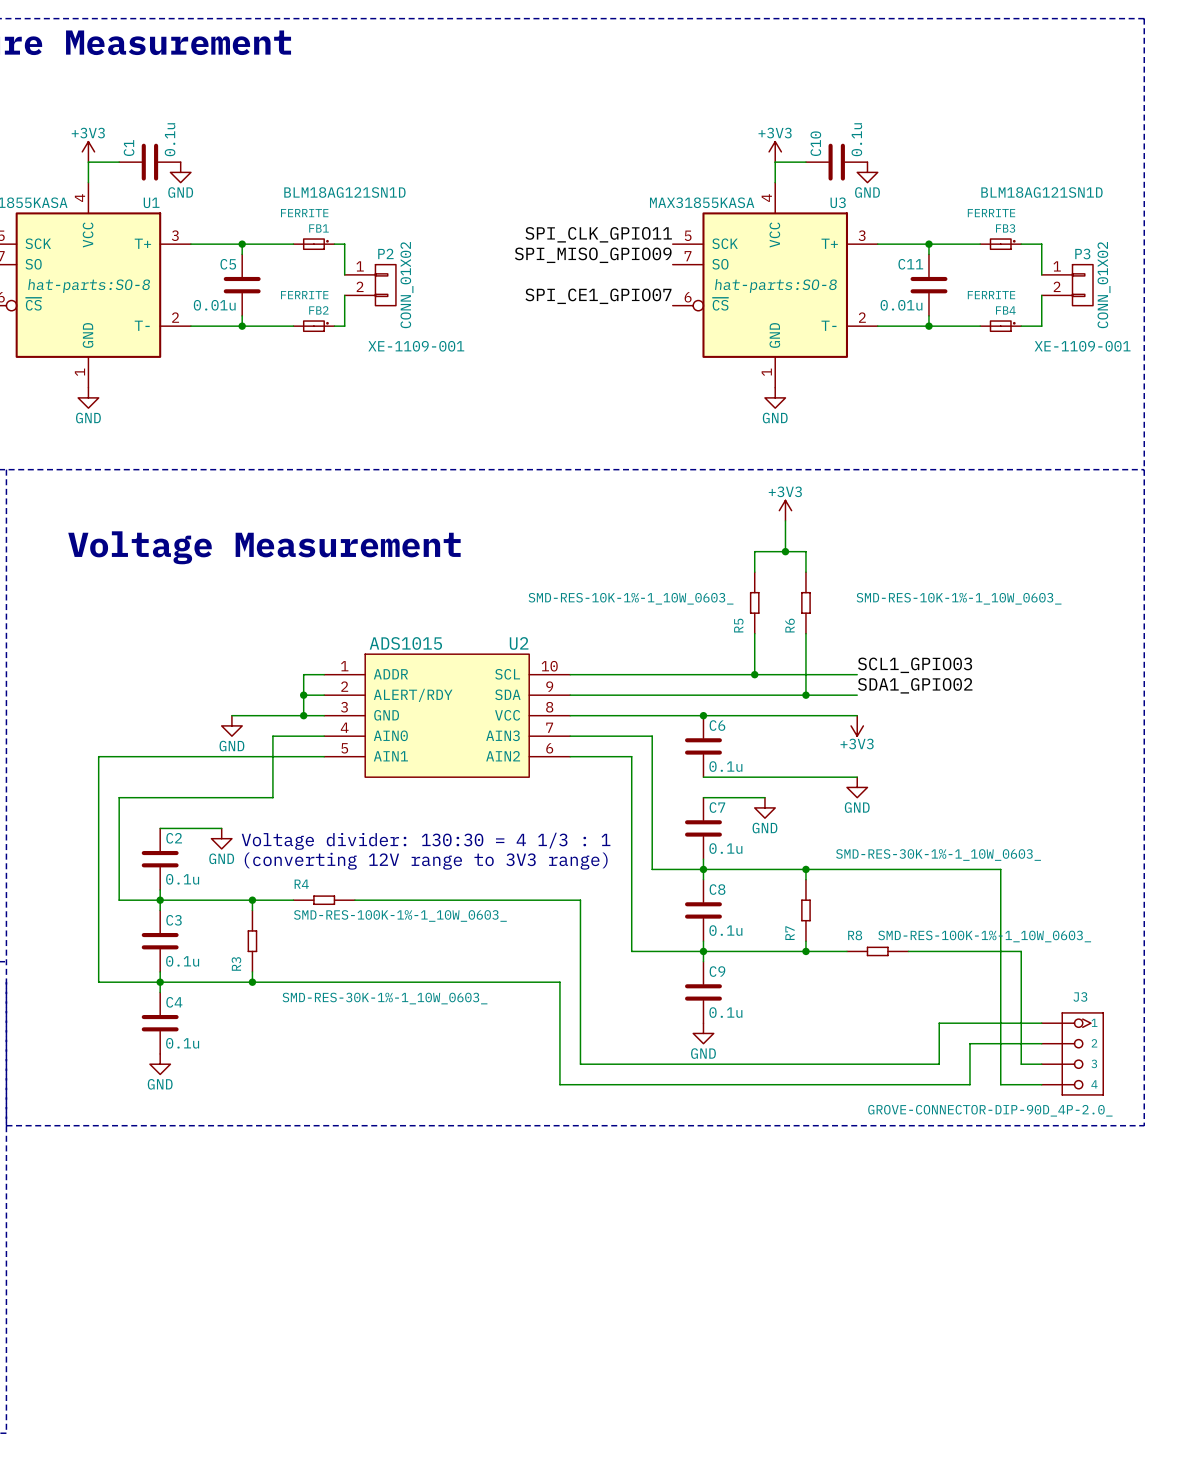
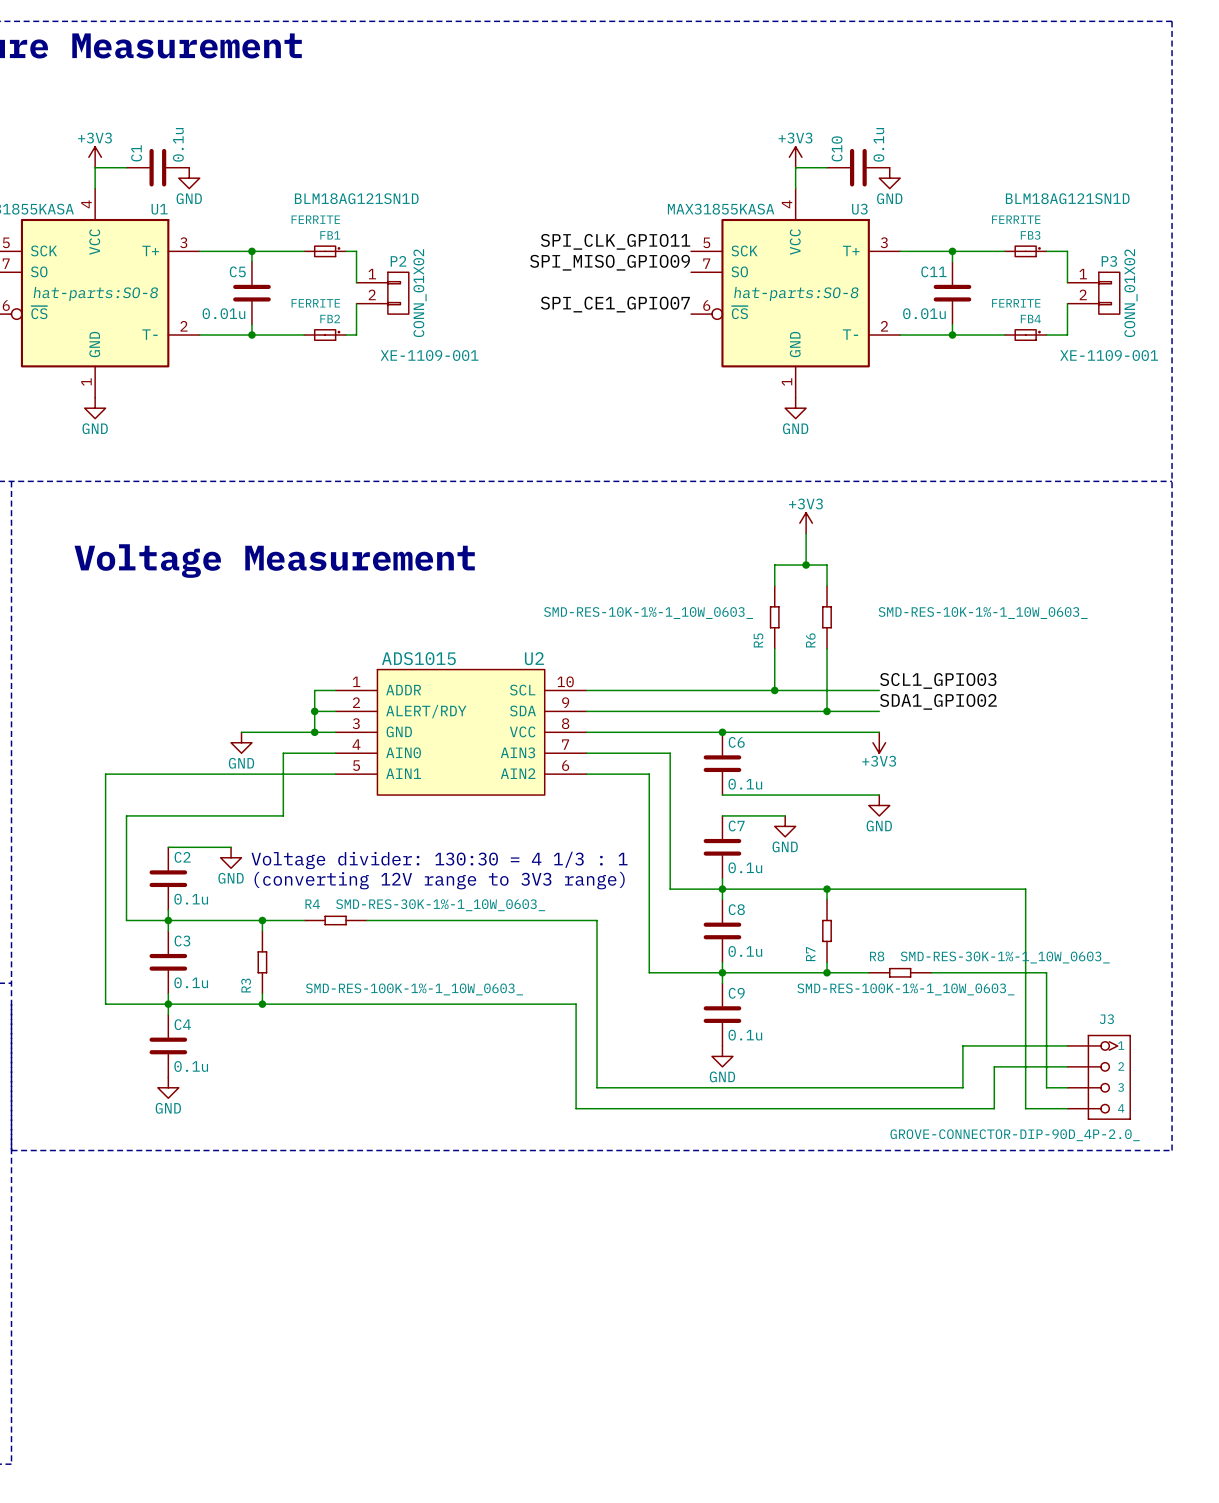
R7 value: SMD-RES-30K-1%-1_10W_0603_ (938, 855) -> SMD-RES-100K-1%-1_10W_0603_ (905, 989)
R4 value: SMD-RES-100K-1%-1_10W_0603_ (400, 915) -> SMD-RES-30K-1%-1_10W_0603_ (440, 905)
R8 value: SMD-RES-100K-1%-1_10W_0603_ (984, 936) -> SMD-RES-30K-1%-1_10W_0603_ (1005, 957)
R3 value: SMD-RES-30K-1%-1_10W_0603_ (385, 998) -> SMD-RES-100K-1%-1_10W_0603_ (414, 989)

